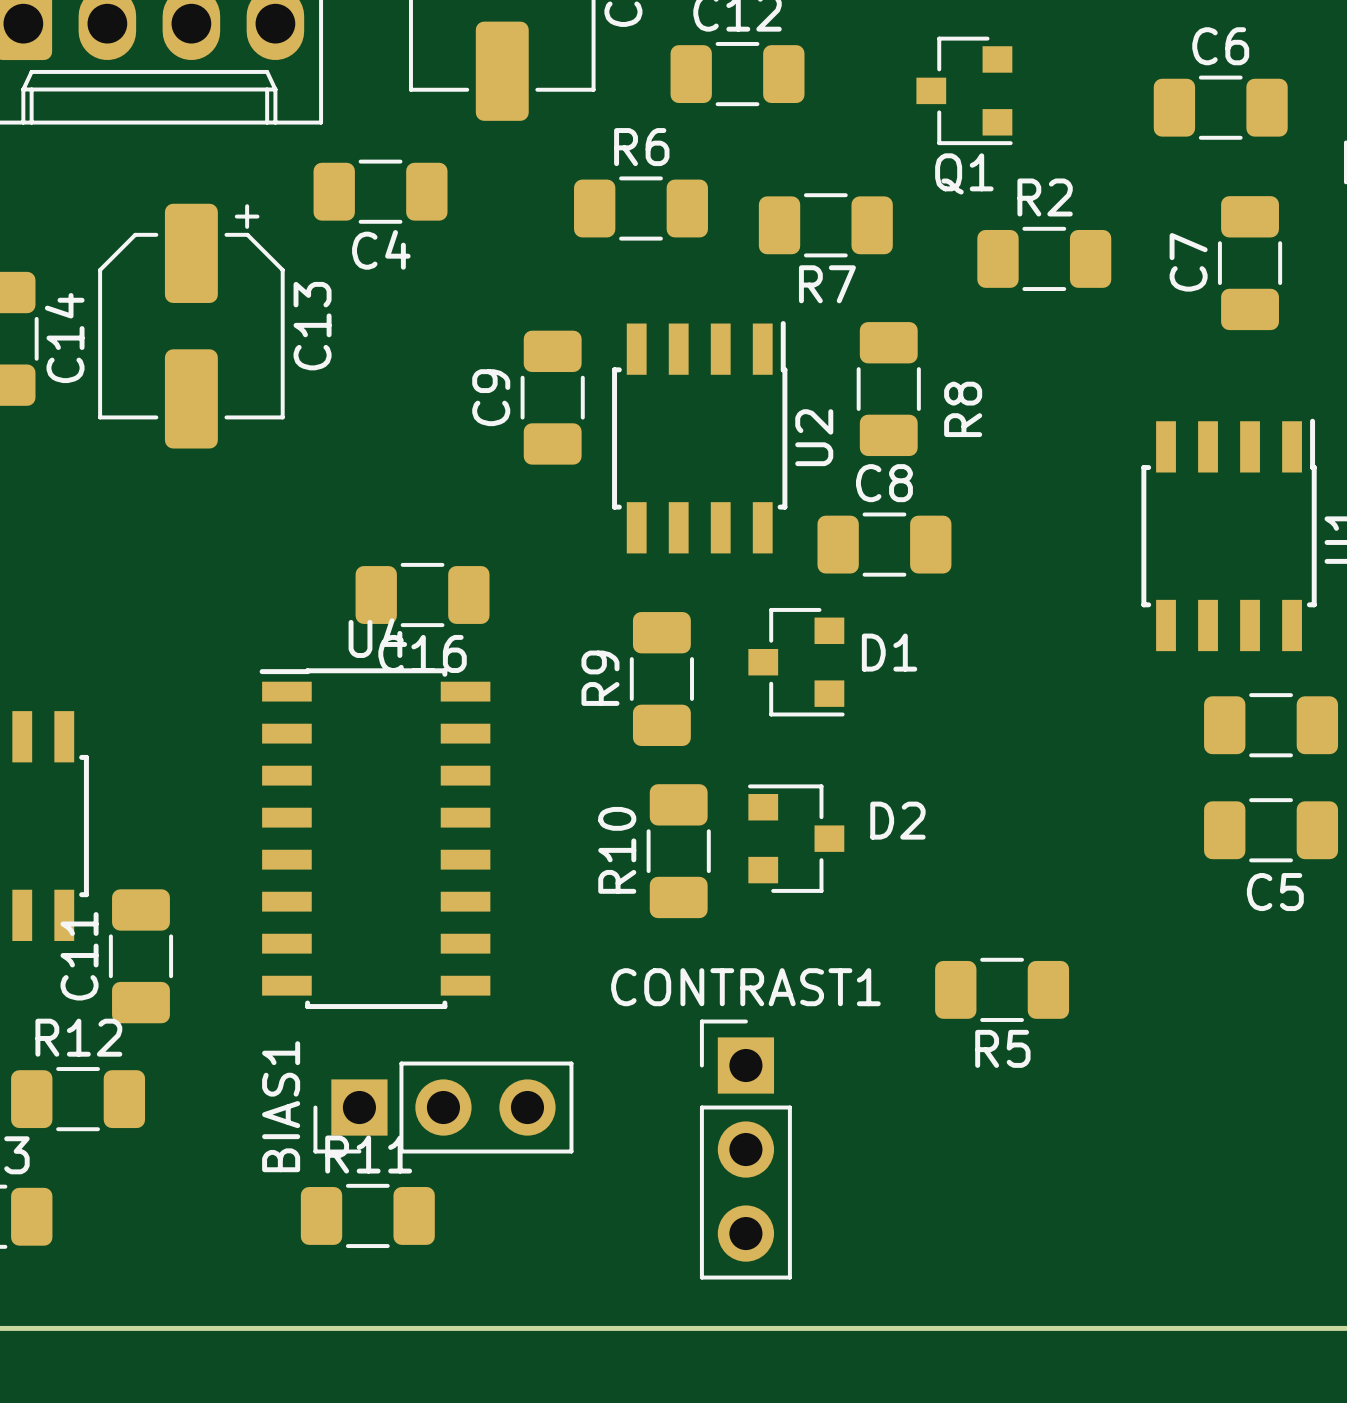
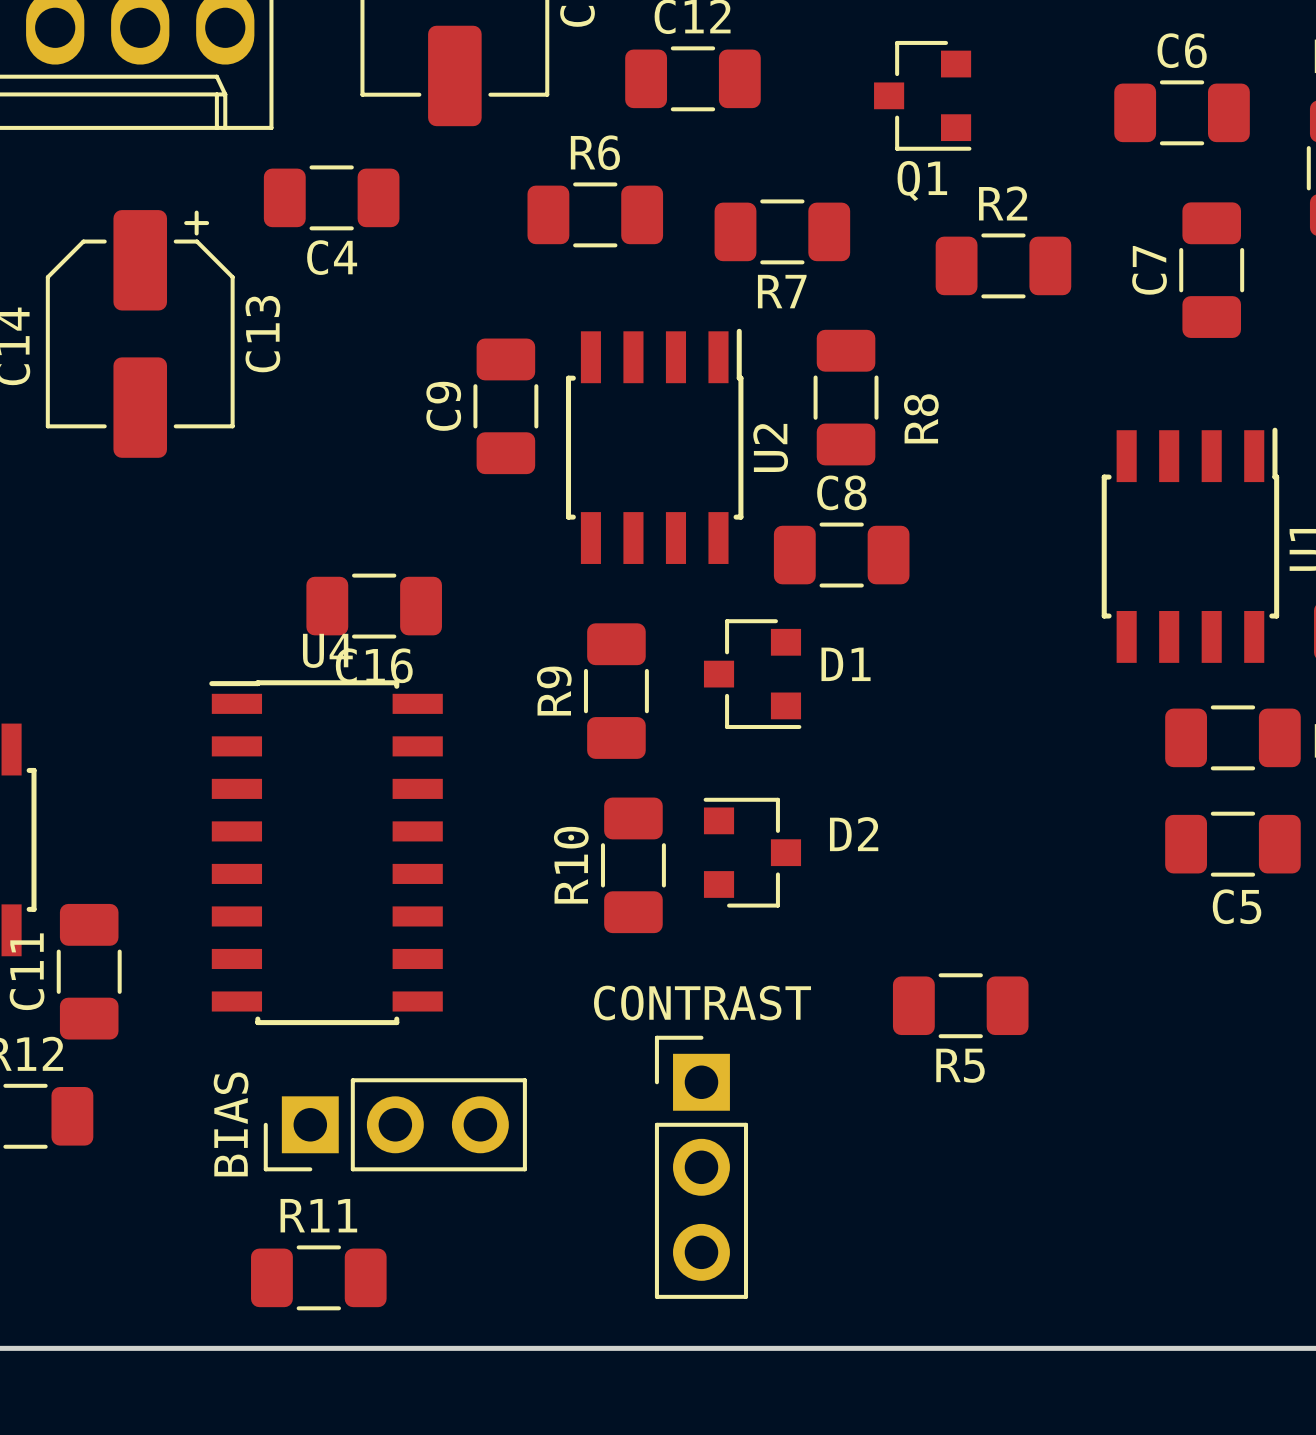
CONTRAST1 name: CONTRAST1 (745, 987) -> CONTRAST (702, 1003)
BIAS1 name: BIAS1 (281, 1106) -> BIAS (231, 1124)
R11 position: (367, 1215) -> (318, 1277)

